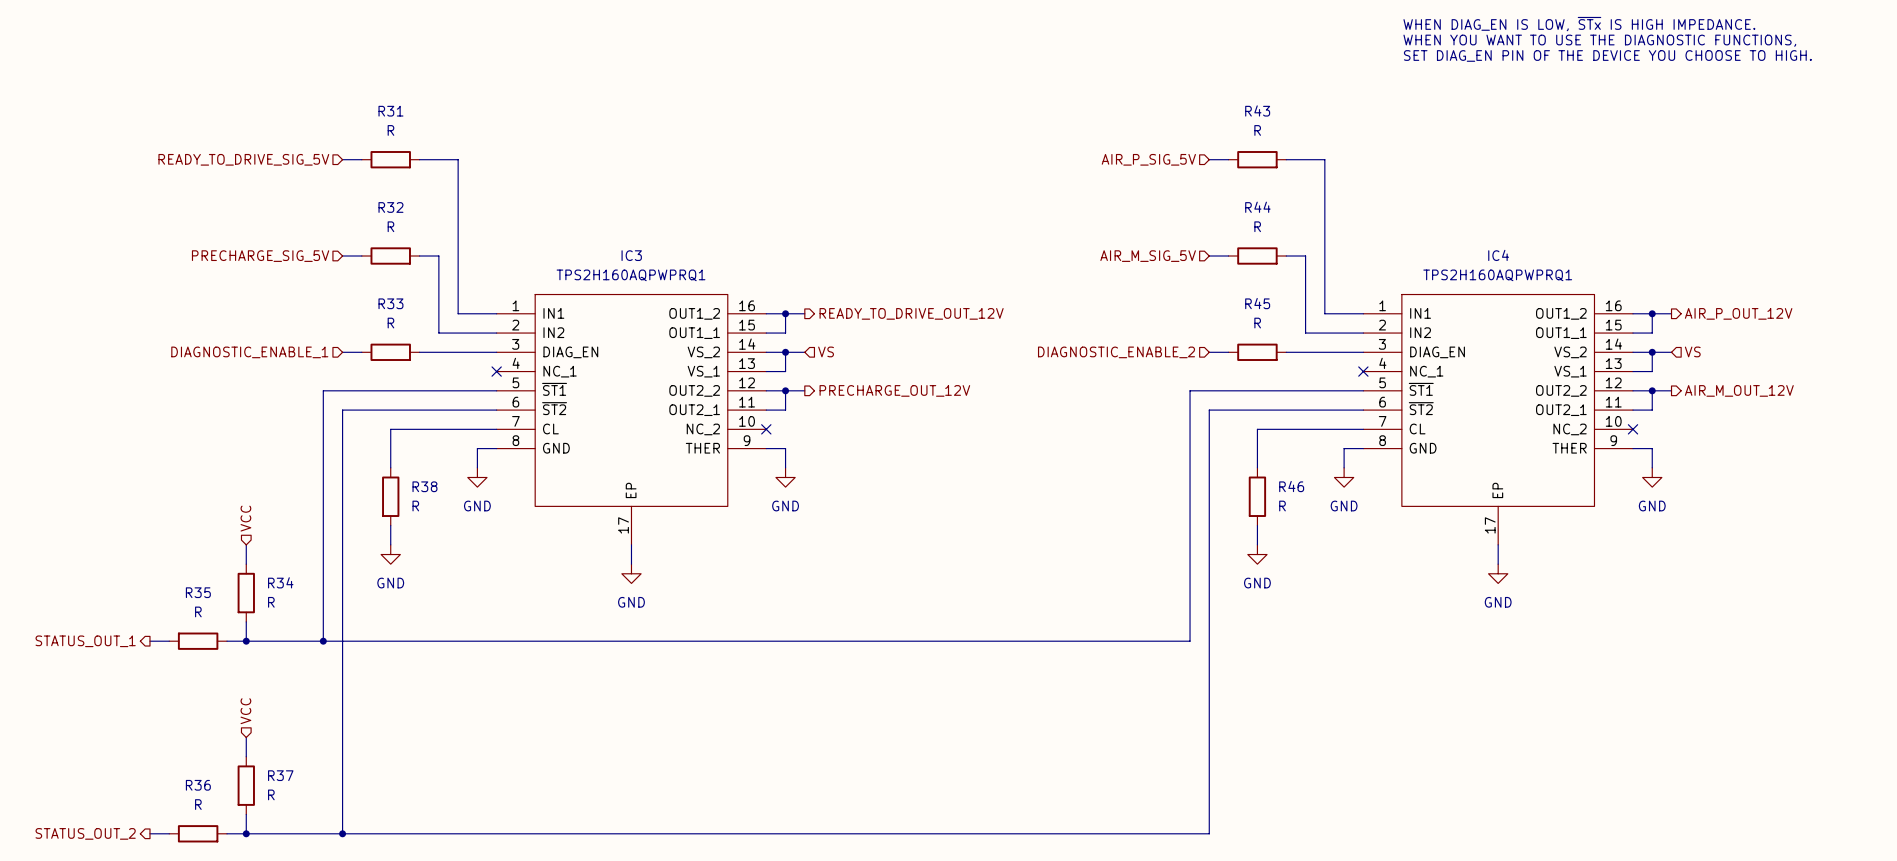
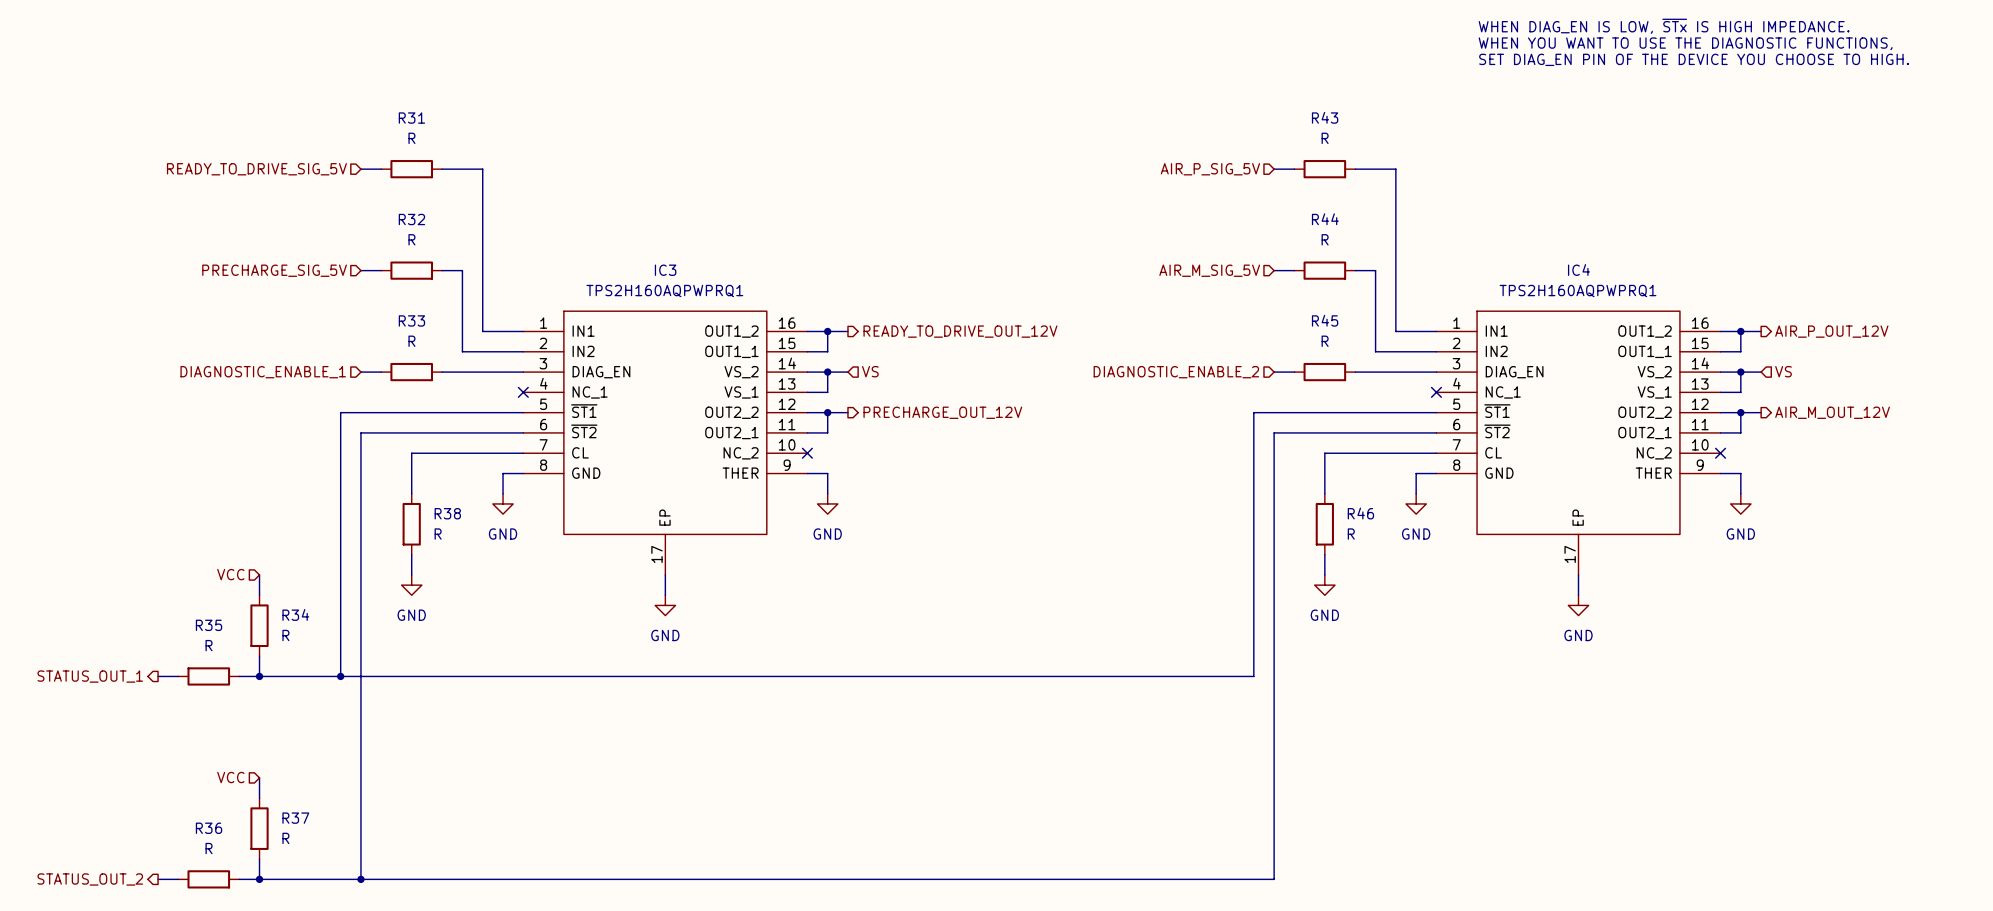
hierarchical label rotation: 0° (245, 518) -> 90° counterclockwise (230, 574)
hierarchical label position: VCC (245, 518) -> VCC (230, 574)
hierarchical label rotation: 0° (245, 711) -> 90° counterclockwise (230, 777)
hierarchical label position: VCC (245, 711) -> VCC (230, 777)

